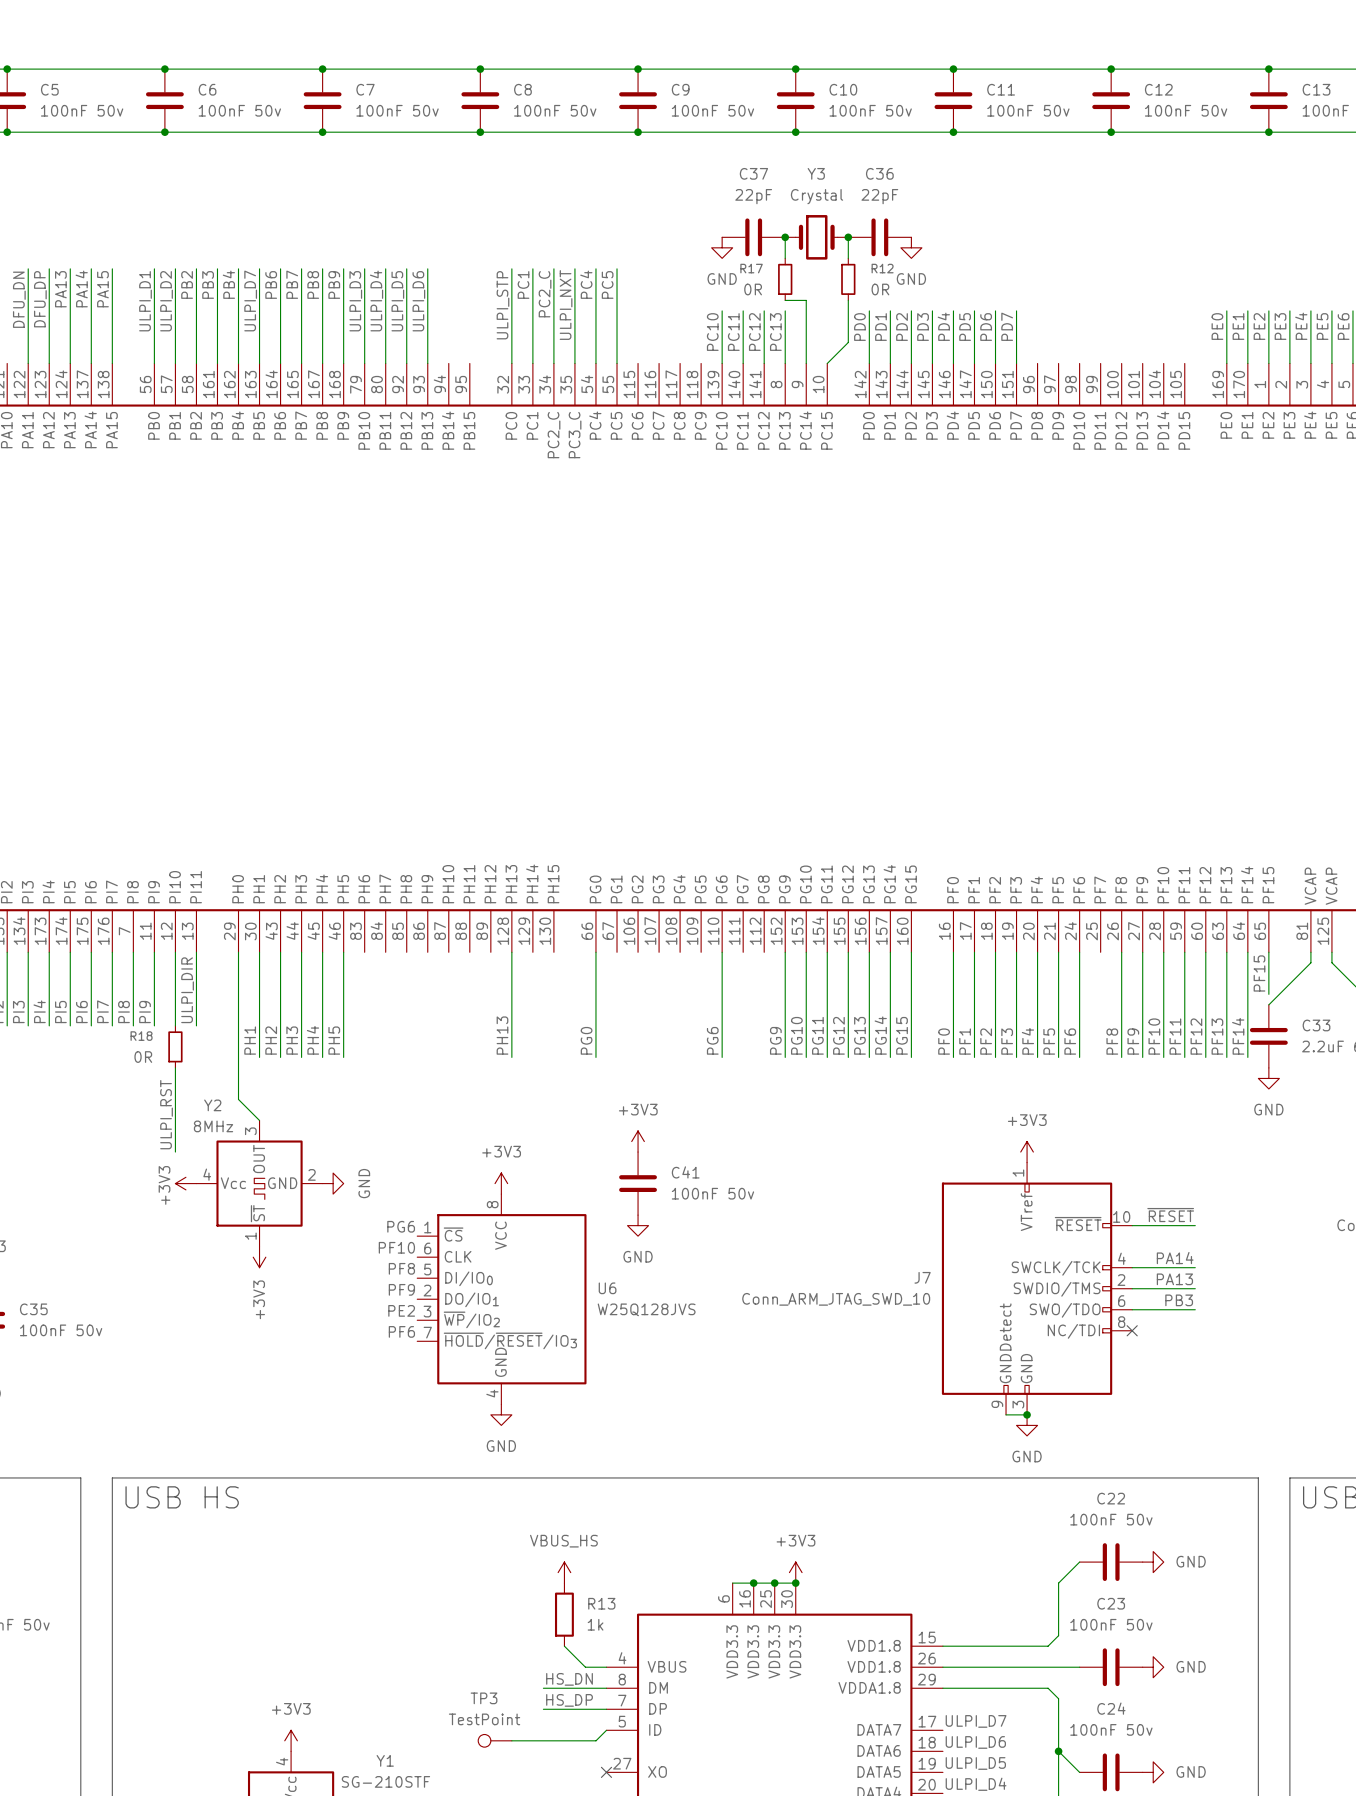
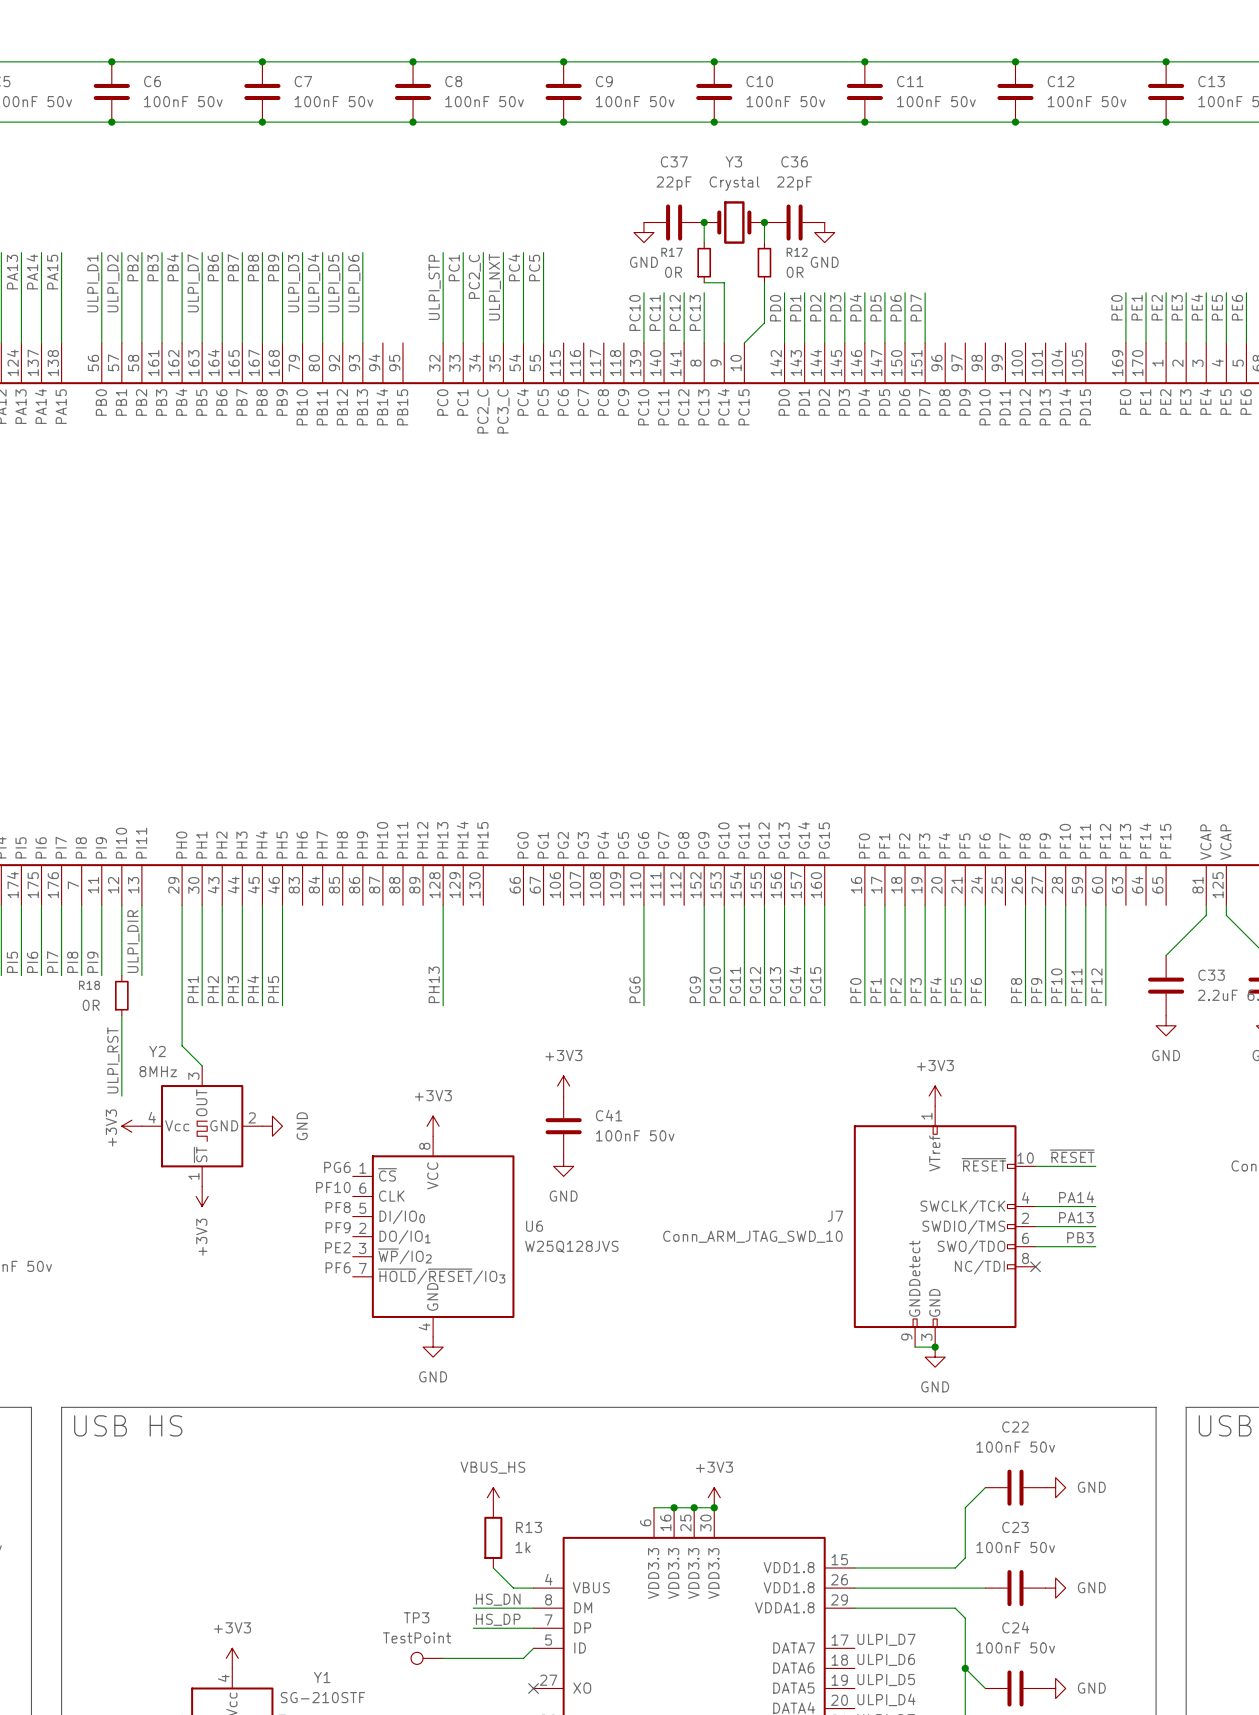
wire: (595, 952) (595, 1057) -> none
wire: (1226, 952) (1226, 1057) -> none
wire: (1247, 952) (1247, 1057) -> none
wire: (1268, 952) (1268, 994) -> none
label: PF15 (1259, 973) -> none
label: PF13 (1217, 1036) -> none
label: PF14 (1238, 1036) -> none
label: PG0 (586, 1040) -> none

